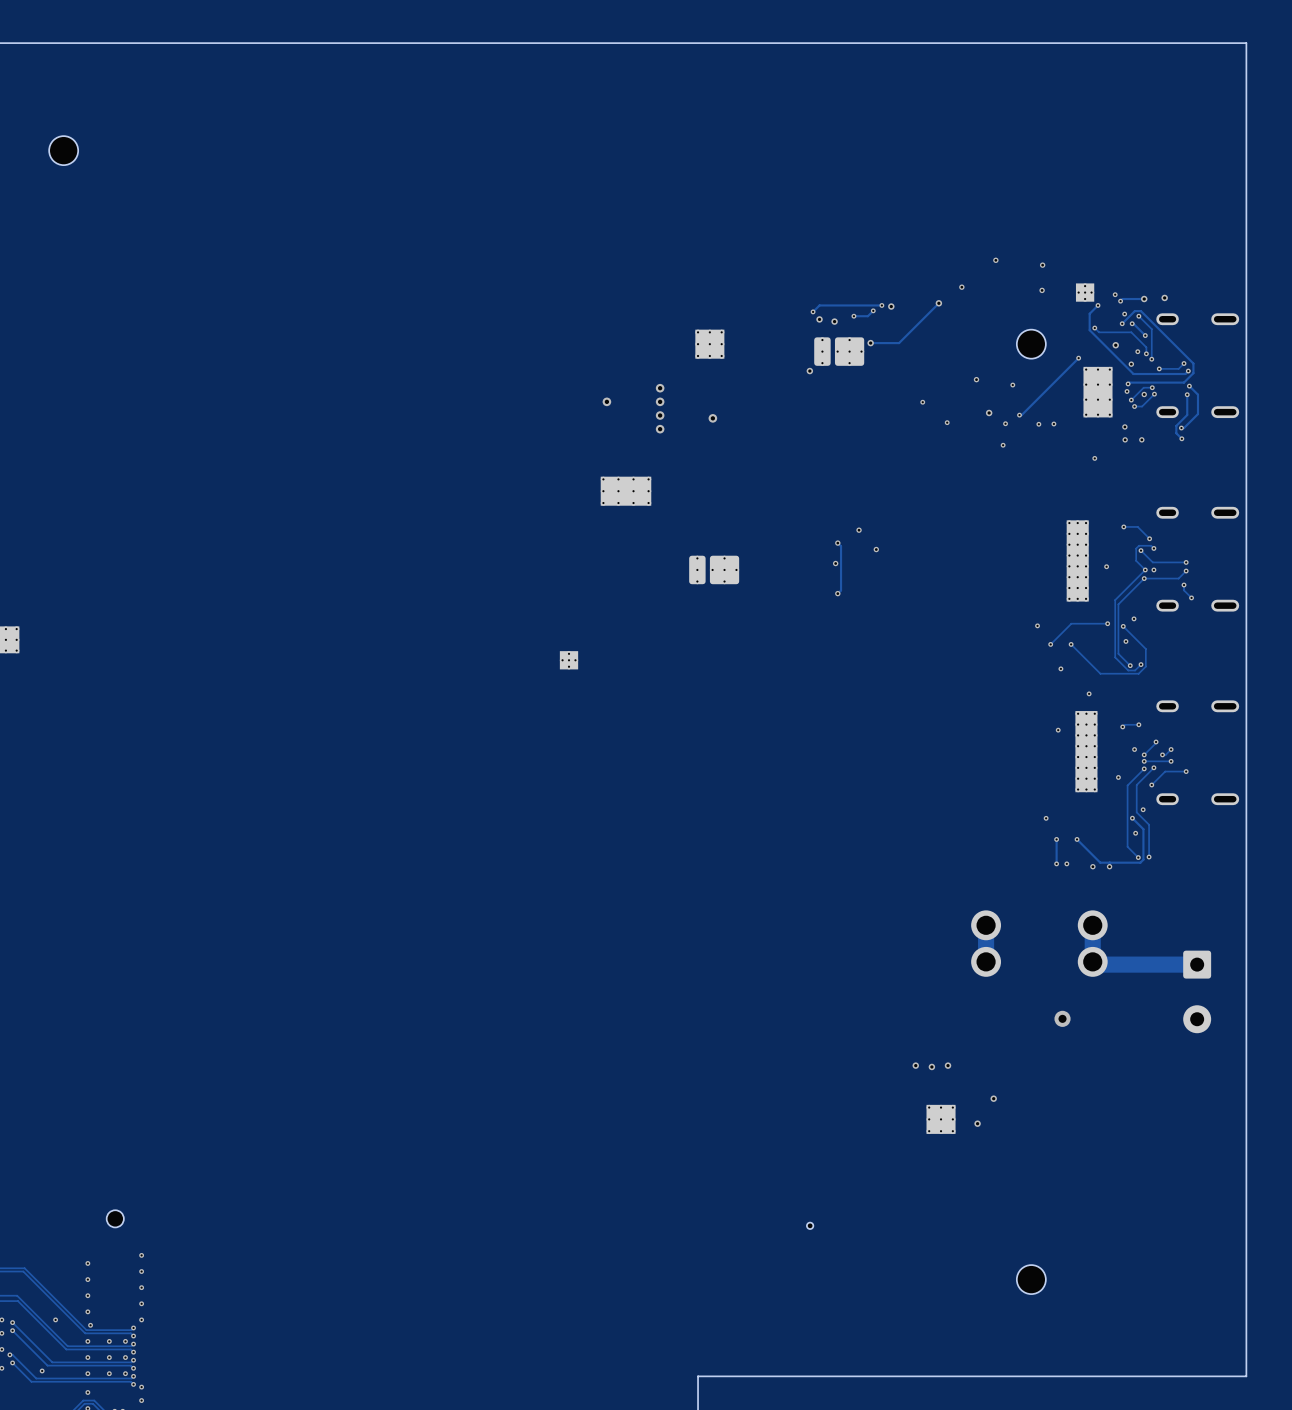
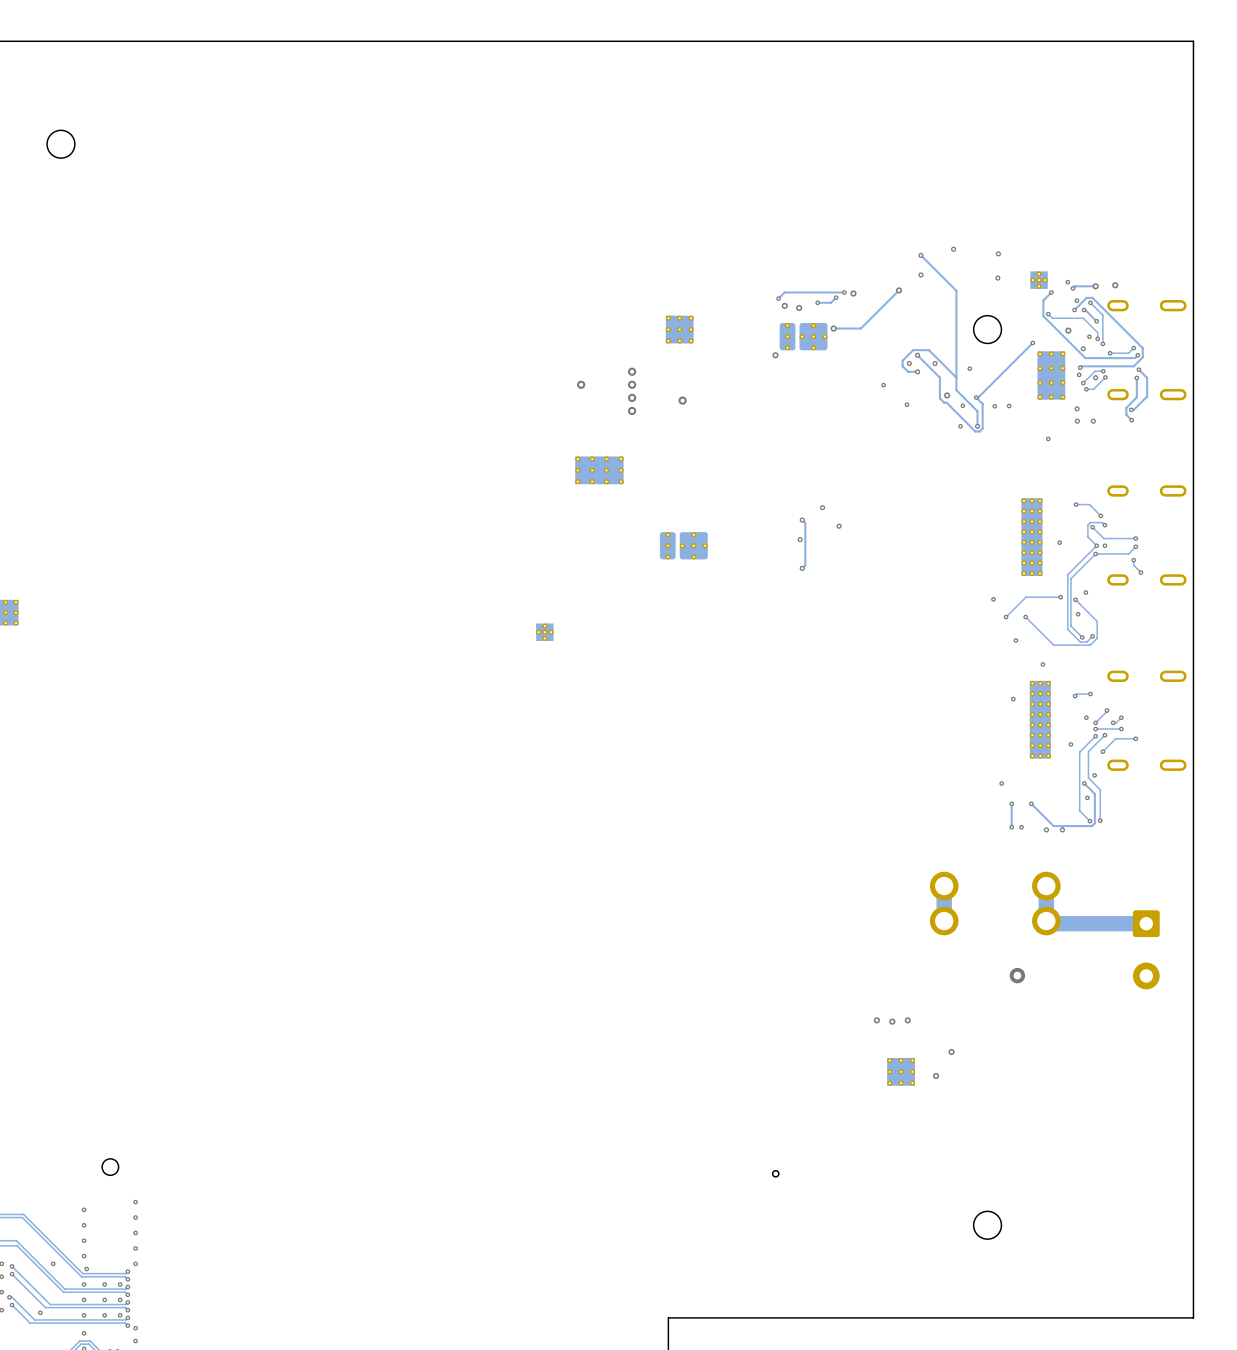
track: none -> (921, 255) (956, 290) (956, 390) (977, 411) (977, 426)
via: none -> (921, 255)
track: none -> (917, 355) (939, 377) (939, 398) (975, 431) (979, 431) (982, 428) (982, 403) (976, 397)
via: none -> (917, 355)
via: none -> (909, 363)
track: none -> (917, 371) (908, 371) (902, 366) (902, 360) (913, 350) (928, 350) (956, 377)
via: none -> (917, 371)
via: none -> (977, 426)

